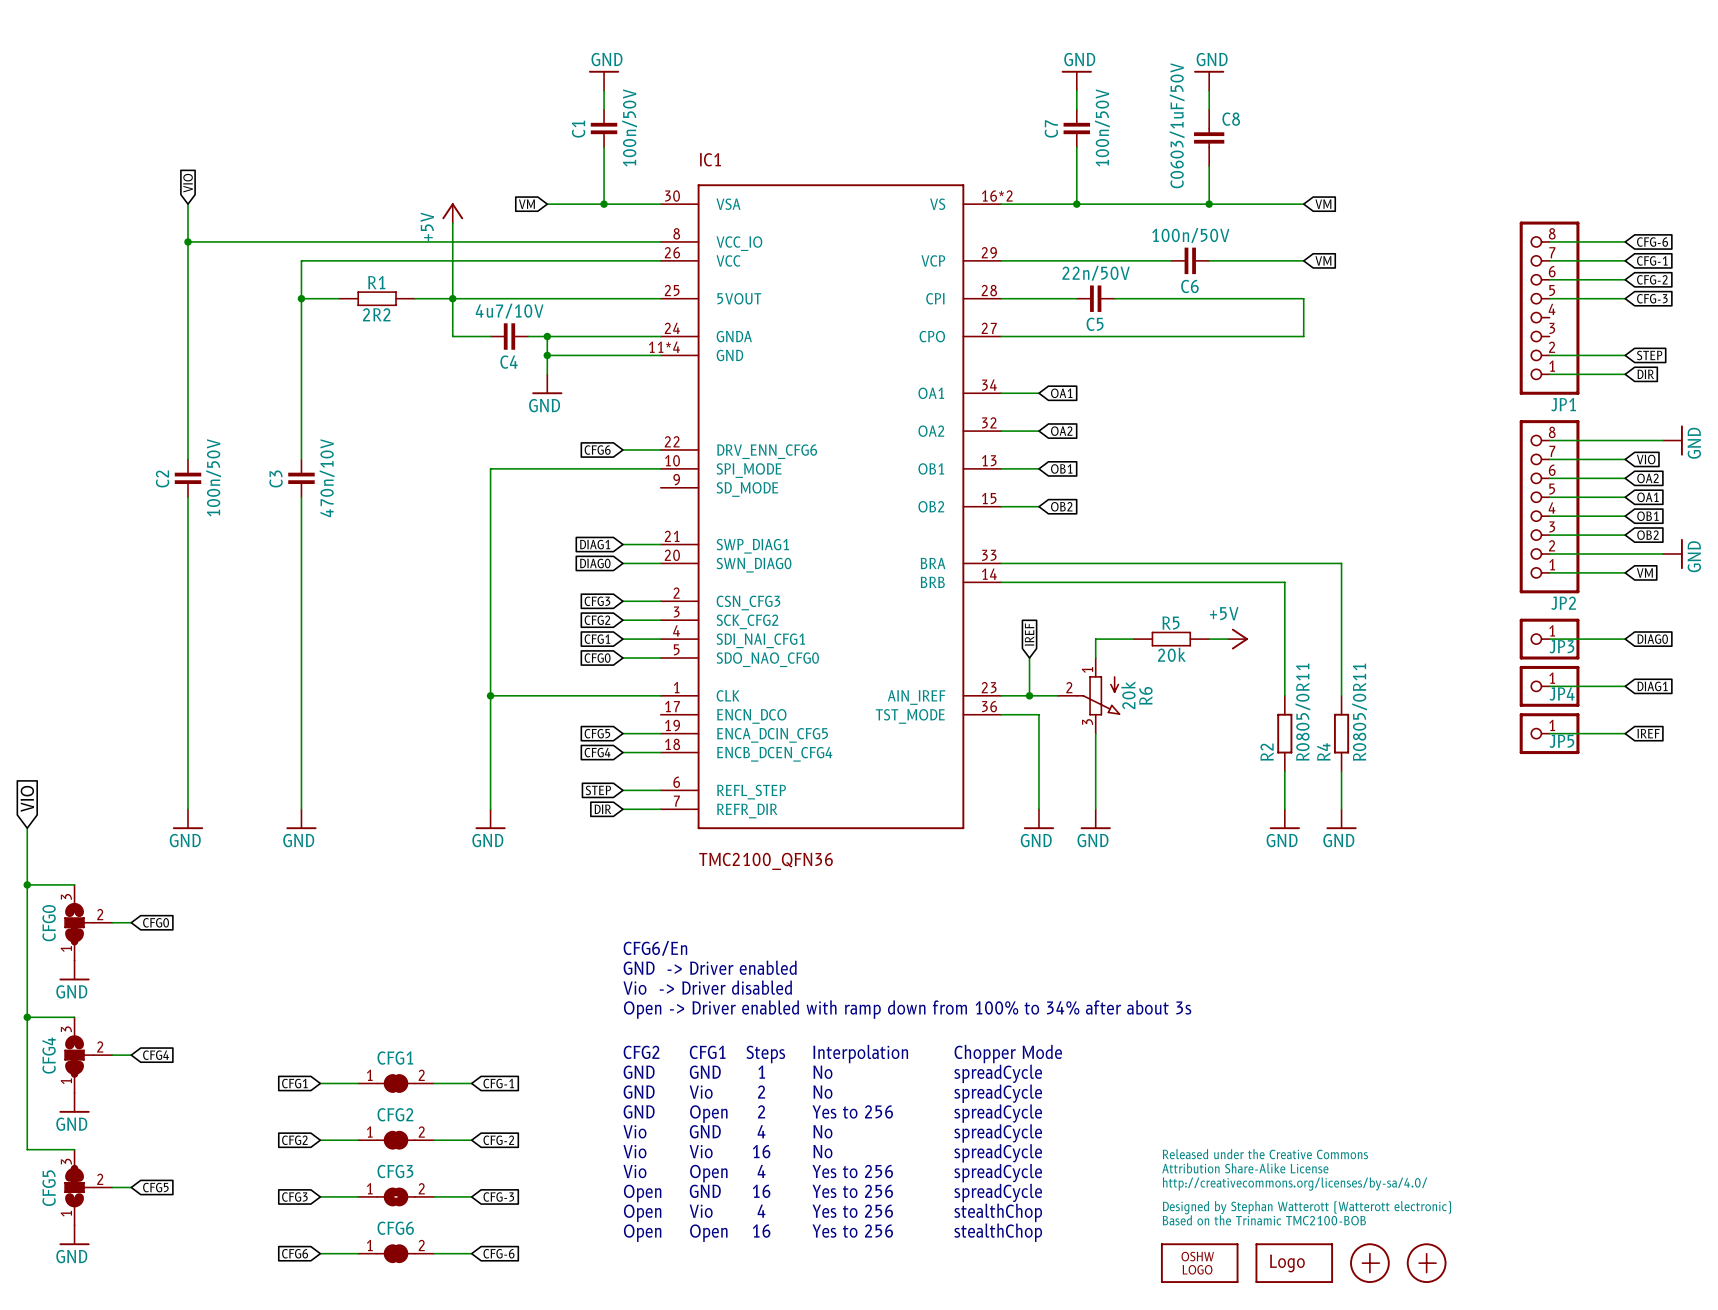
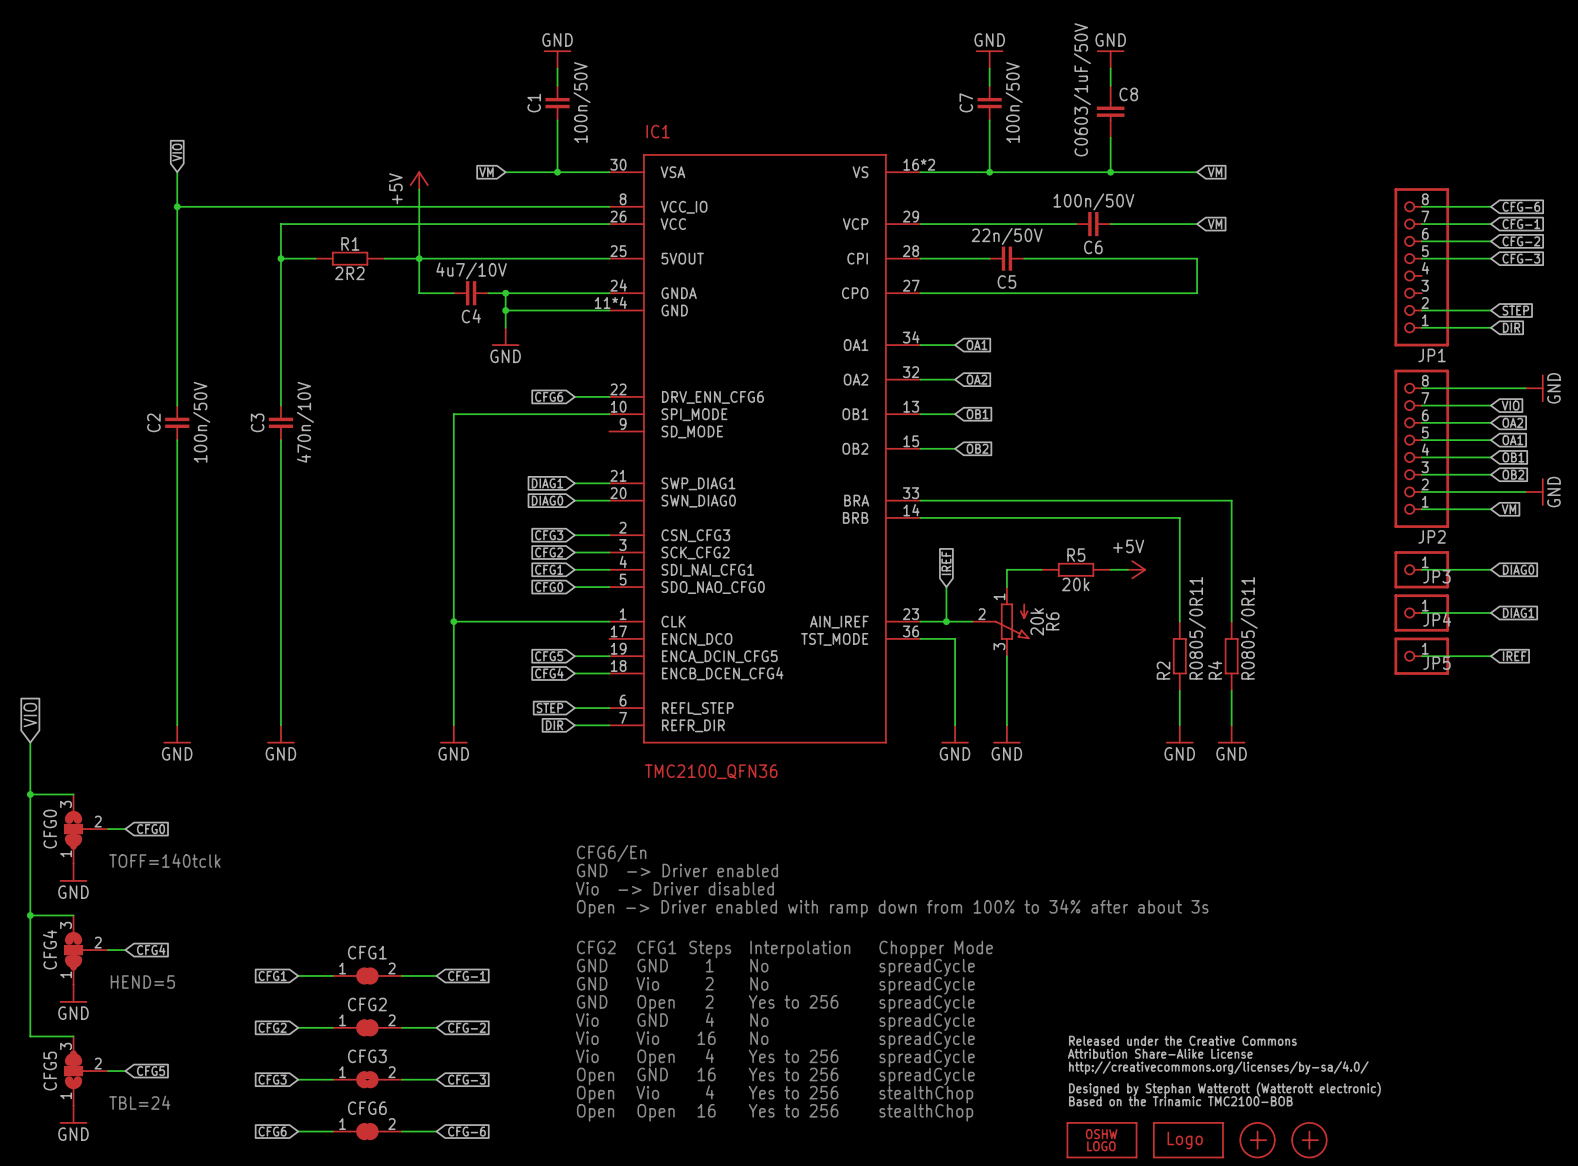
text: none -> TOFF=140tclk (164, 860)
text: none -> HEND=5 (142, 982)
text: none -> TBL=24 (139, 1102)

